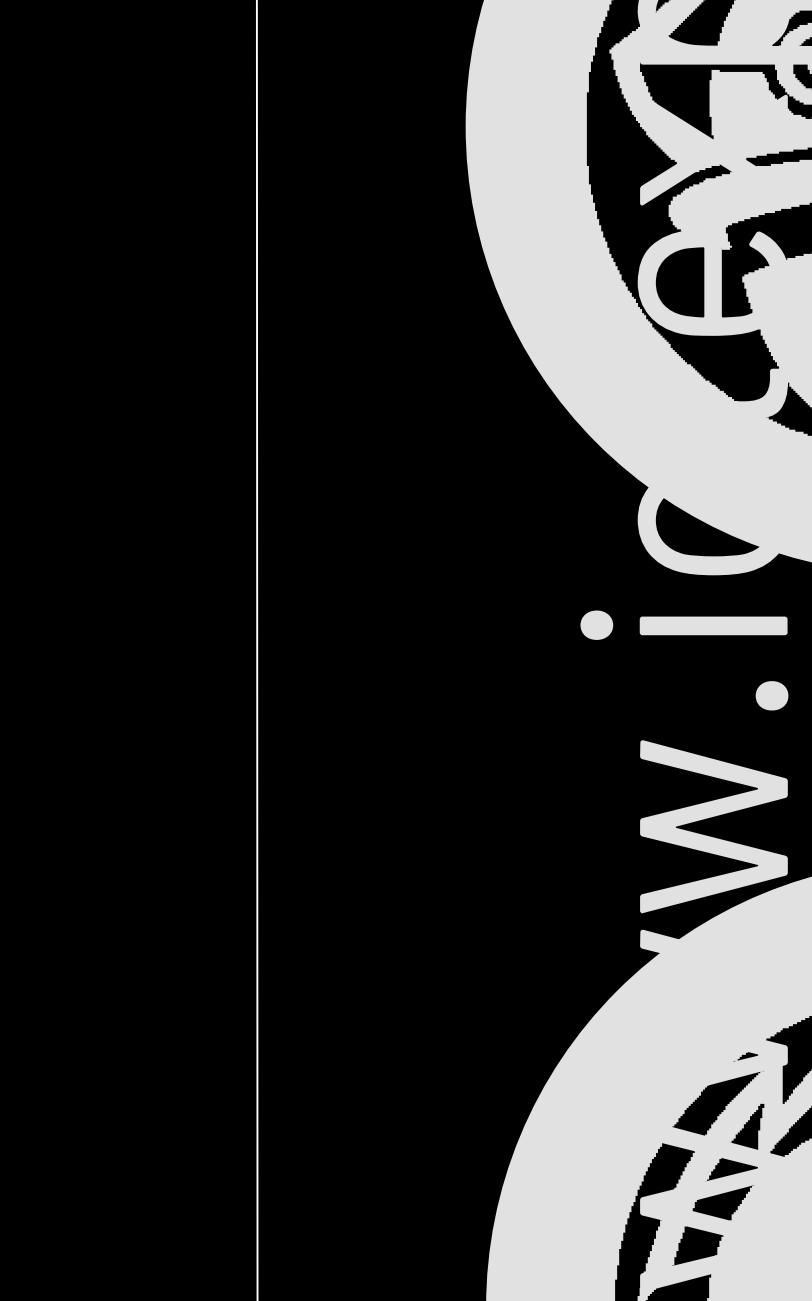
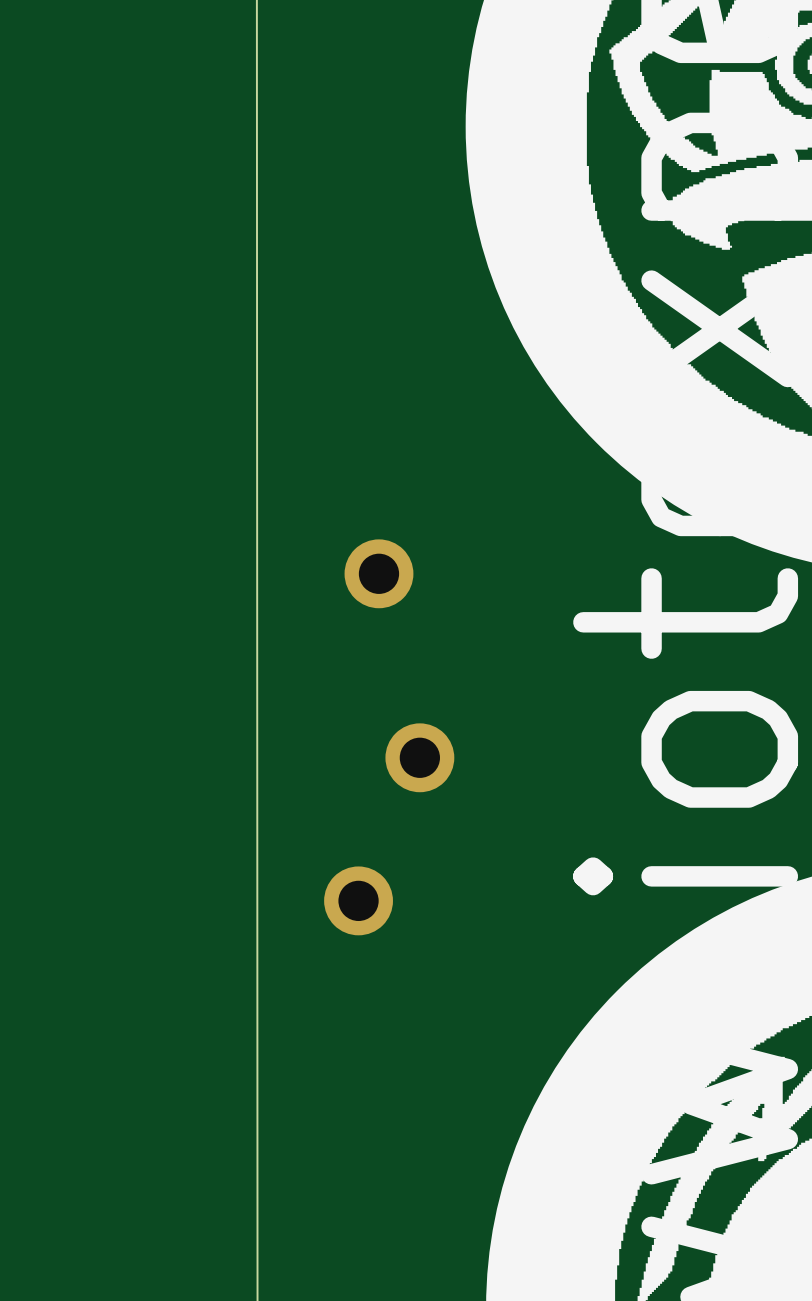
via: none -> (378, 573)
via: none -> (419, 757)
via: none -> (358, 900)

